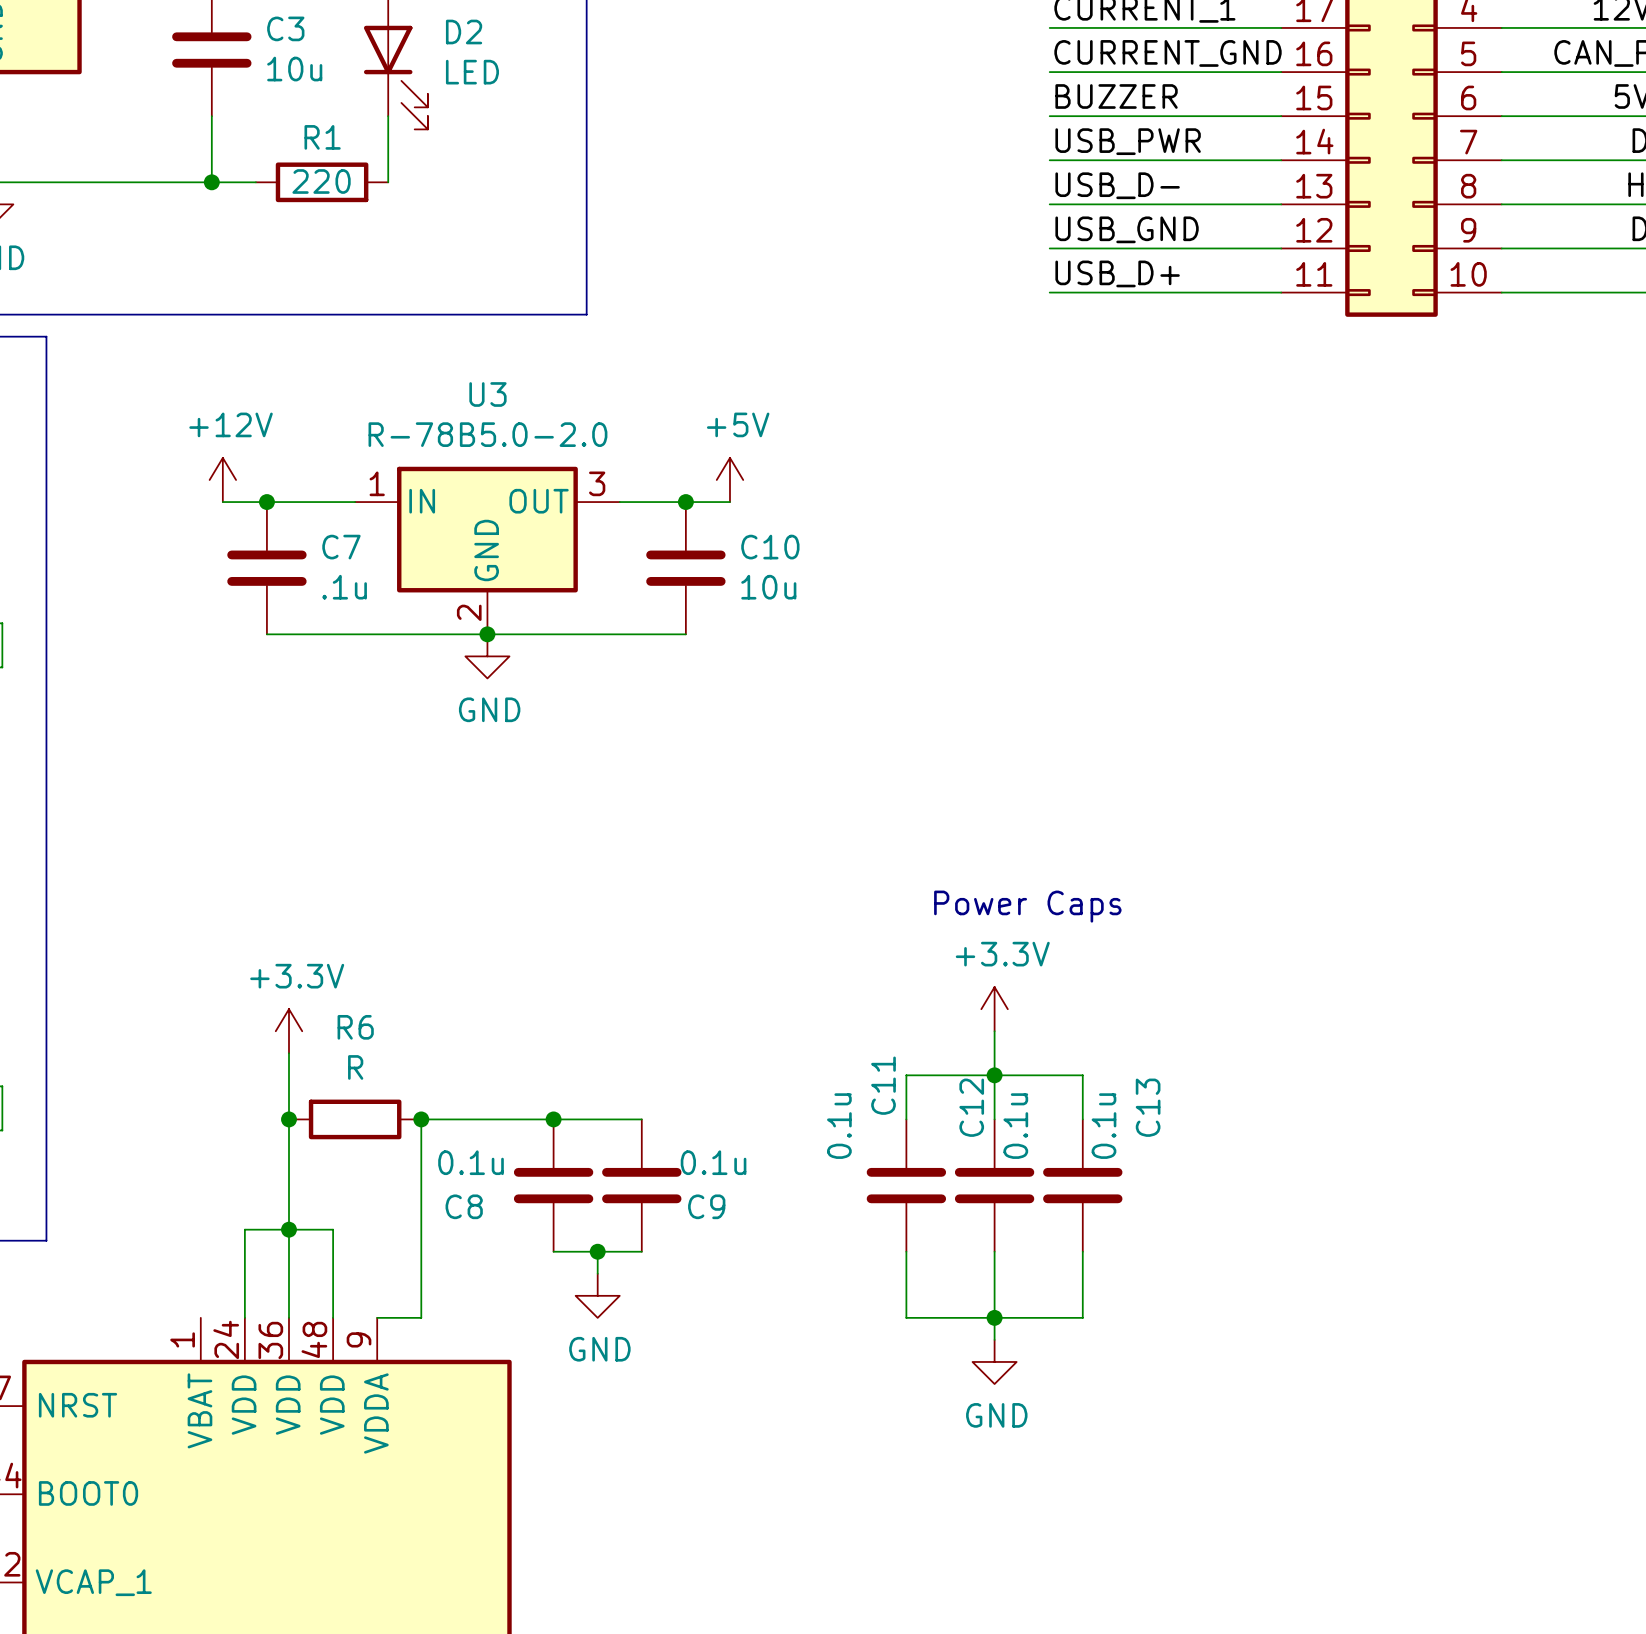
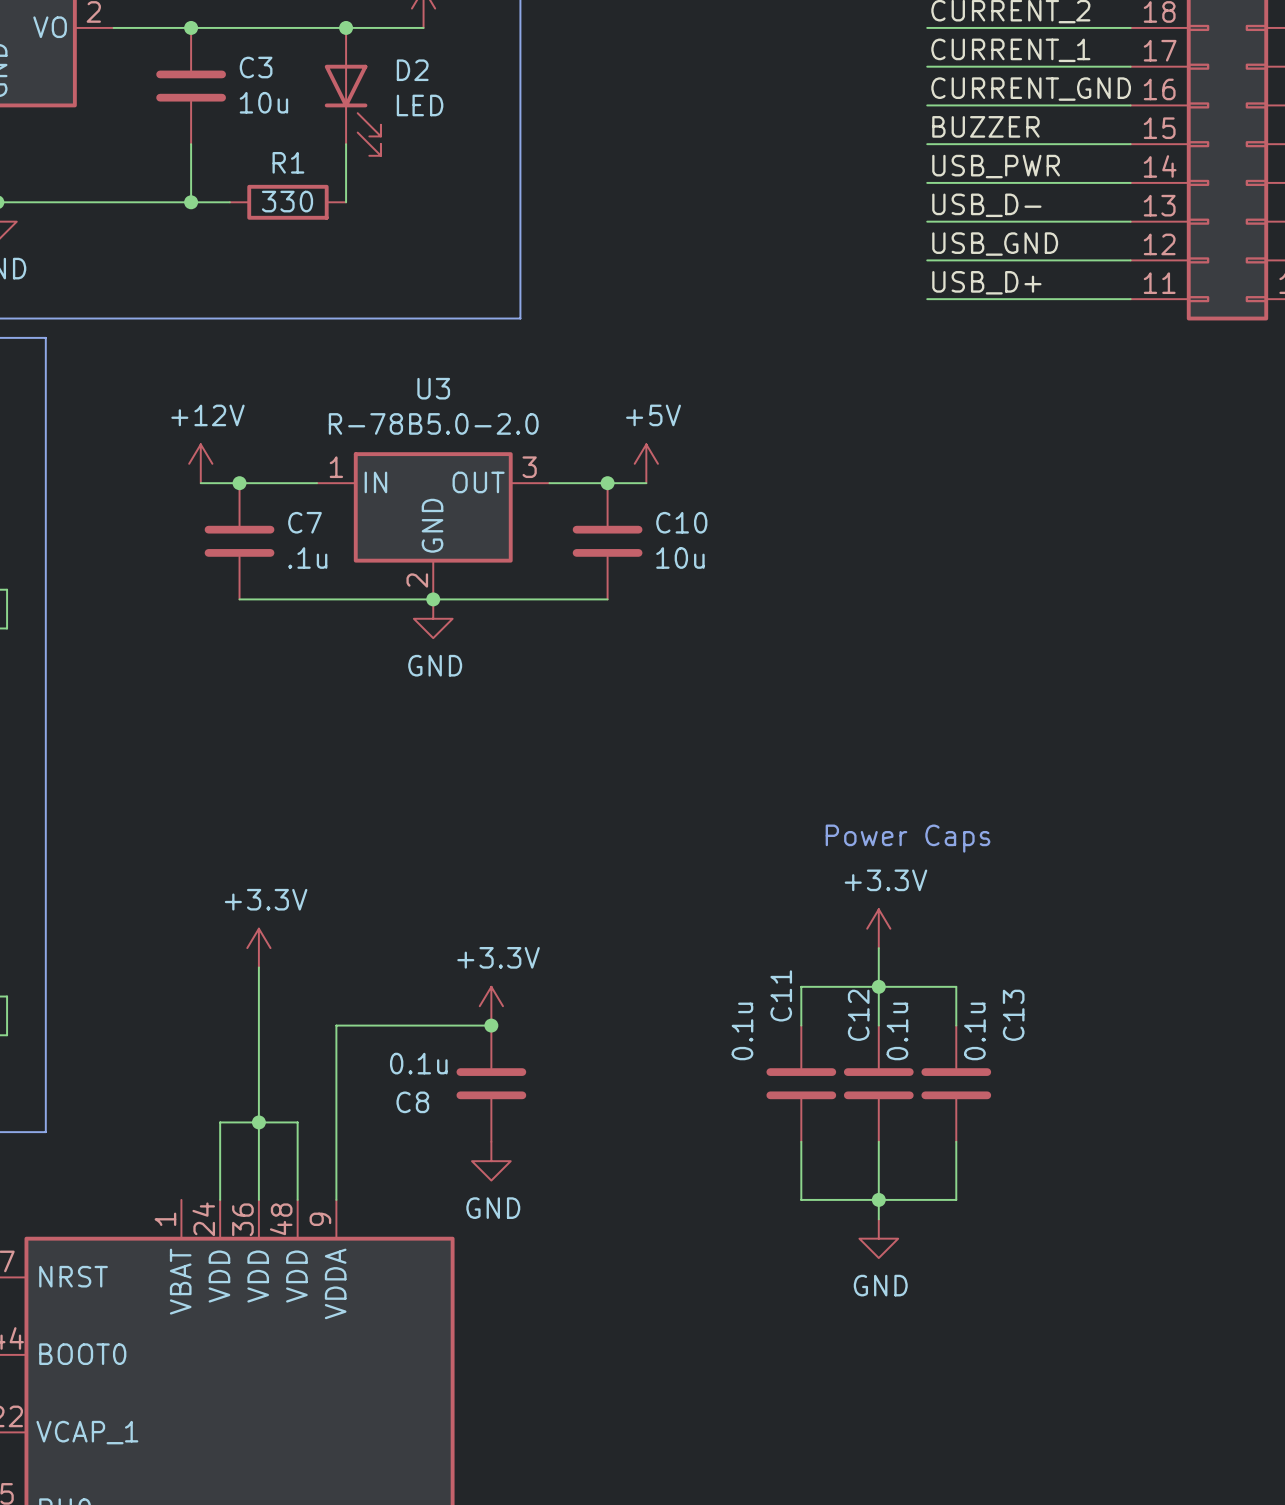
R1 value: 220 (321, 181) -> 330 (287, 201)
power symbol: none -> +3.3V (491, 1006)
junction: (288, 1119) -> none
R6: R (355, 1119) -> none
wire: (421, 1119) (421, 1317) (377, 1317) -> (375, 1025) (336, 1025) (336, 1199)
junction: (421, 1119) -> none
wire: (553, 1119) (641, 1119) -> none
C9: 0.1u (641, 1185) -> none
wire: (553, 1251) (641, 1251) -> none
wire: (597, 1251) (597, 1273) -> none
junction: (597, 1251) -> none
power symbol position: GND (597, 1295) -> GND (491, 1161)

